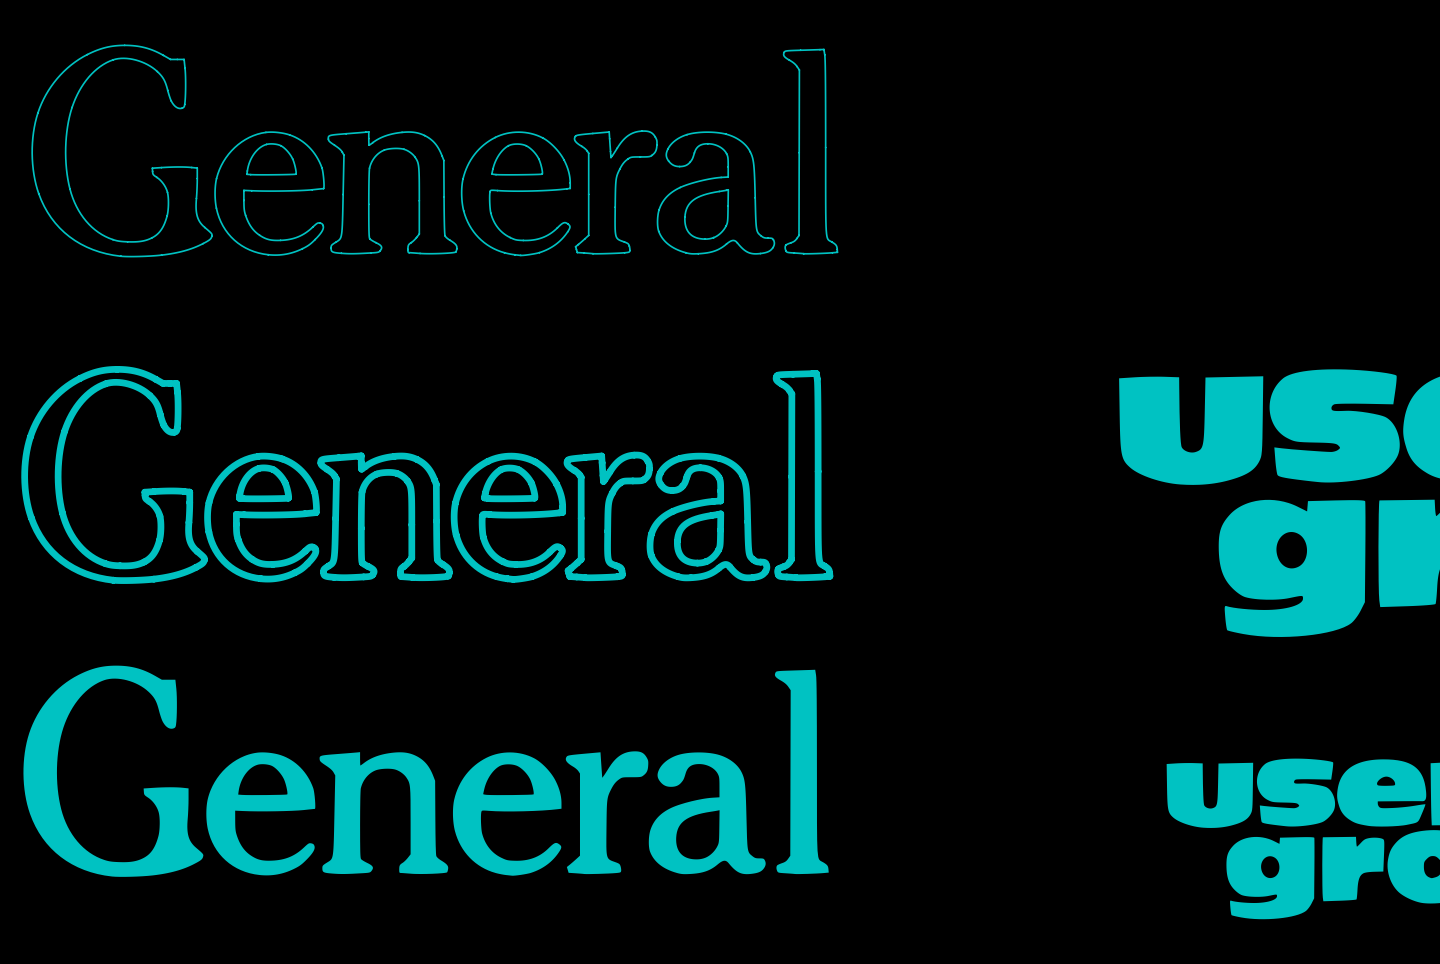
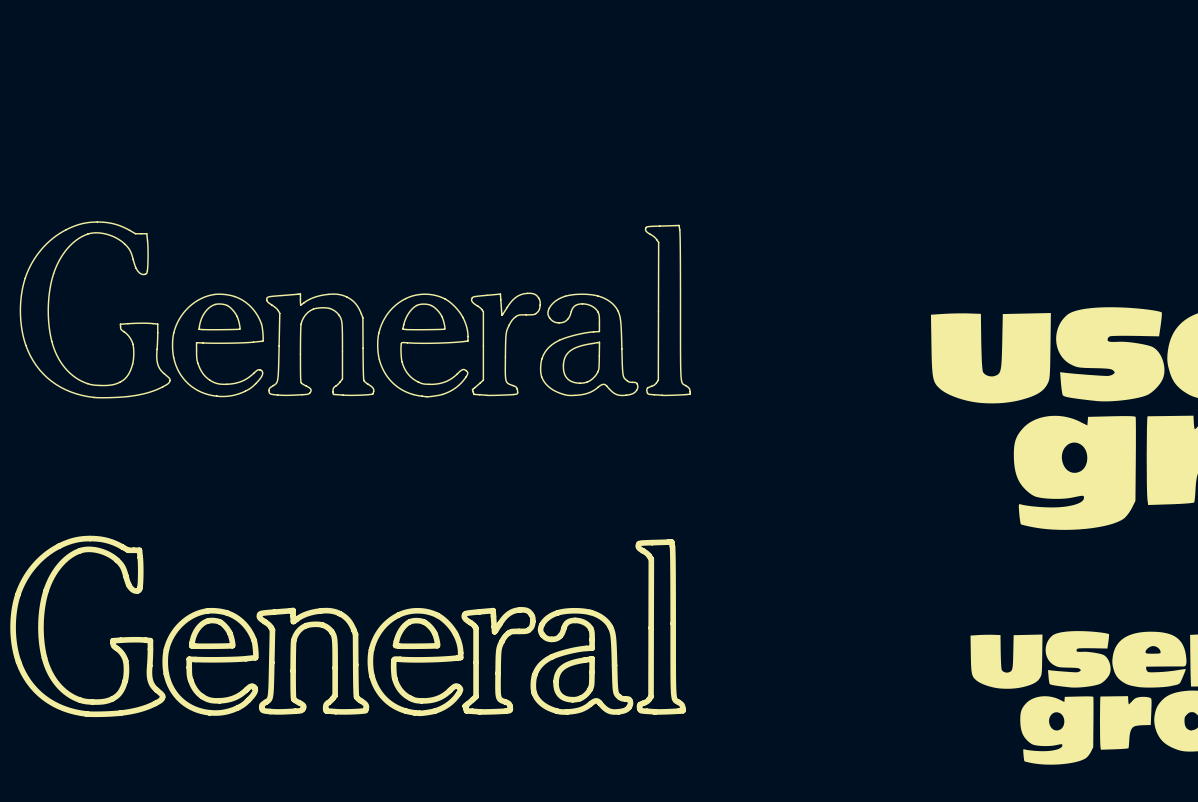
line: (124, 45) (147, 48) (170, 59) (184, 59) (184, 106) (180, 108) (174, 105) (162, 77) (144, 63) (129, 58) (118, 58) (97, 68) (79, 90) (68, 121) (65, 158) (71, 193) (80, 214) (98, 232) (117, 240) (142, 241) (159, 232) (167, 212) (166, 190) (162, 182) (153, 174) (152, 168) (197, 168) (196, 214) (200, 222) (212, 235) (207, 241) (187, 250) (161, 255) (131, 256) (113, 255) (92, 249) (74, 240) (59, 228) (47, 212) (37, 188) (32, 163) (32, 137) (37, 112) (48, 90) (63, 71) (83, 56) (103, 48) (124, 45) -> none
line: (823, 49) (826, 230) (828, 239) (836, 245) (837, 252) (788, 252) (785, 249) (785, 245) (794, 241) (799, 235) (799, 69) (783, 53) (787, 50) (823, 49) -> none
line: (368, 131) (369, 145) (385, 135) (408, 132) (424, 135) (436, 145) (443, 160) (444, 235) (456, 245) (455, 252) (429, 253) (408, 252) (408, 244) (419, 234) (418, 167) (417, 160) (411, 153) (404, 149) (396, 148) (386, 149) (379, 152) (373, 159) (369, 168) (369, 237) (380, 245) (380, 250) (376, 252) (353, 253) (331, 250) (331, 245) (339, 239) (341, 233) (343, 155) (340, 149) (329, 141) (328, 136) (368, 131) -> none
line: (641, 131) (650, 132) (654, 136) (656, 141) (655, 151) (650, 156) (631, 157) (626, 159) (619, 170) (615, 182) (615, 233) (617, 238) (628, 244) (629, 251) (602, 253) (577, 252) (575, 246) (588, 235) (588, 153) (575, 141) (575, 136) (609, 132) (610, 157) (625, 137) (632, 133) (641, 131) -> none
line: (265, 132) (245, 139) (225, 157) (216, 180) (215, 204) (223, 226) (237, 243) (258, 253) (283, 254) (296, 251) (309, 244) (321, 232) (322, 224) (317, 223) (303, 234) (292, 238) (277, 240) (265, 238) (255, 231) (247, 220) (244, 209) (243, 190) (288, 190) (323, 188) (322, 172) (316, 156) (302, 141) (286, 134) (265, 132) -> none
line: (726, 134) (740, 141) (750, 153) (754, 167) (756, 229) (763, 237) (772, 238) (773, 245) (768, 251) (756, 253) (746, 251) (733, 240) (717, 249) (707, 252) (691, 253) (678, 250) (665, 241) (658, 231) (657, 216) (661, 204) (669, 194) (682, 186) (705, 179) (728, 177) (727, 158) (725, 151) (720, 147) (704, 144) (696, 147) (688, 163) (677, 166) (668, 160) (667, 150) (674, 141) (687, 134) (706, 132) (726, 134) -> none
line: (495, 137) (515, 132) (537, 135) (553, 145) (565, 162) (569, 175) (570, 188) (532, 191) (491, 190) (489, 192) (490, 209) (493, 221) (501, 232) (512, 238) (523, 240) (537, 239) (550, 233) (563, 223) (569, 225) (569, 228) (562, 238) (546, 250) (522, 255) (500, 251) (481, 240) (467, 221) (461, 196) (464, 172) (476, 151) (495, 137) -> none
line: (266, 144) (259, 147) (252, 155) (246, 174) (295, 174) (293, 159) (285, 149) (277, 144) (266, 144) -> none
line: (508, 145) (520, 144) (530, 148) (538, 159) (542, 174) (492, 173) (498, 156) (508, 145) -> none
line: (728, 189) (727, 221) (723, 230) (716, 236) (708, 238) (697, 238) (690, 234) (686, 228) (684, 219) (686, 209) (689, 203) (703, 194) (728, 189) -> none
line: (117, 369) (139, 372) (163, 383) (176, 383) (176, 430) (172, 432) (166, 429) (155, 401) (137, 387) (122, 382) (110, 382) (89, 392) (71, 414) (60, 445) (58, 482) (63, 517) (73, 538) (90, 556) (110, 564) (135, 565) (151, 556) (160, 536) (159, 514) (154, 506) (145, 498) (144, 492) (189, 492) (189, 538) (192, 546) (204, 559) (199, 565) (179, 574) (153, 579) (123, 580) (105, 579) (85, 573) (67, 564) (52, 551) (40, 536) (29, 512) (25, 487) (25, 461) (30, 436) (40, 414) (56, 395) (75, 380) (96, 372) (117, 369) -> (97, 222) (116, 224) (135, 233) (146, 233) (146, 272) (143, 274) (138, 272) (128, 248) (113, 236) (101, 233) (92, 233) (74, 241) (59, 259) (50, 285) (48, 315) (52, 345) (60, 362) (75, 377) (91, 384) (112, 384) (126, 377) (133, 360) (132, 342) (121, 329) (120, 324) (157, 324) (157, 362) (160, 369) (170, 380) (166, 385) (149, 392) (128, 396) (102, 397) (87, 396) (70, 391) (55, 384) (43, 373) (33, 360) (24, 341) (20, 320) (21, 298) (25, 278) (33, 259) (46, 243) (62, 231) (79, 224) (97, 222)
line: (816, 373) (779, 374) (776, 377) (791, 393) (791, 559) (786, 565) (778, 569) (778, 573) (780, 576) (829, 576) (828, 569) (820, 563) (818, 554) (816, 373) -> (679, 225) (648, 226) (645, 228) (658, 242) (658, 380) (654, 384) (647, 388) (649, 394) (690, 394) (689, 388) (682, 383) (681, 375) (679, 225)
line: (361, 455) (320, 460) (321, 465) (332, 473) (336, 479) (334, 557) (332, 563) (323, 569) (324, 574) (345, 577) (369, 576) (373, 574) (373, 569) (361, 561) (362, 492) (365, 483) (371, 476) (378, 473) (389, 472) (397, 473) (404, 477) (409, 484) (411, 491) (411, 558) (401, 568) (400, 576) (422, 577) (448, 576) (448, 569) (437, 559) (436, 484) (429, 469) (417, 459) (401, 456) (378, 459) (361, 469) (361, 455) -> (300, 293) (266, 298) (267, 301) (279, 313) (277, 378) (276, 383) (269, 388) (269, 392) (287, 395) (307, 394) (310, 392) (310, 388) (300, 381) (301, 324) (309, 311) (323, 307) (336, 312) (342, 323) (342, 378) (333, 387) (333, 394) (372, 393) (373, 388) (363, 380) (362, 317) (357, 305) (346, 297) (333, 294) (314, 297) (300, 305) (300, 293)
line: (634, 455) (642, 456) (647, 460) (649, 465) (648, 475) (642, 480) (624, 481) (619, 483) (611, 494) (608, 506) (608, 557) (610, 562) (620, 568) (622, 575) (594, 577) (569, 576) (568, 570) (581, 559) (581, 477) (568, 465) (567, 460) (601, 455) (603, 481) (617, 461) (625, 457) (634, 455) -> (527, 293) (534, 294) (538, 297) (540, 302) (539, 310) (534, 314) (519, 315) (515, 317) (508, 326) (505, 335) (505, 378) (507, 383) (516, 387) (517, 393) (473, 394) (472, 389) (483, 380) (483, 311) (472, 302) (472, 298) (500, 294) (501, 315) (513, 298) (527, 293)
line: (258, 456) (237, 463) (218, 481) (208, 504) (208, 528) (215, 550) (230, 567) (251, 577) (276, 578) (288, 575) (302, 568) (314, 556) (315, 548) (310, 547) (296, 558) (284, 562) (269, 564) (257, 562) (247, 555) (239, 544) (236, 533) (236, 514) (280, 514) (316, 512) (315, 496) (309, 480) (295, 465) (279, 458) (258, 456) -> (214, 294) (197, 300) (181, 315) (173, 334) (173, 354) (179, 372) (191, 386) (208, 394) (229, 396) (251, 387) (261, 377) (262, 371) (257, 369) (246, 378) (236, 382) (224, 384) (214, 382) (205, 376) (199, 367) (196, 358) (196, 342) (262, 341) (262, 328) (257, 314) (245, 302) (232, 295) (214, 294)
line: (718, 458) (698, 456) (679, 458) (666, 465) (659, 474) (660, 484) (670, 490) (681, 487) (689, 471) (696, 468) (712, 471) (717, 475) (720, 482) (720, 501) (698, 503) (674, 510) (661, 518) (653, 528) (650, 540) (651, 555) (657, 565) (670, 574) (683, 577) (699, 576) (710, 573) (725, 564) (739, 575) (749, 577) (760, 575) (766, 569) (765, 562) (755, 561) (749, 553) (746, 491) (743, 477) (733, 465) (718, 458) -> (597, 295) (581, 294) (565, 296) (554, 301) (548, 309) (549, 317) (557, 322) (566, 320) (573, 307) (579, 304) (592, 306) (599, 315) (599, 331) (580, 333) (561, 339) (550, 345) (543, 354) (540, 364) (541, 376) (547, 385) (558, 392) (568, 395) (581, 394) (603, 384) (614, 393) (623, 395) (632, 393) (637, 388) (636, 383) (628, 381) (623, 375) (620, 323) (618, 311) (609, 301) (597, 295)
line: (487, 461) (508, 456) (529, 459) (545, 469) (557, 486) (562, 499) (562, 512) (524, 514) (484, 514) (482, 516) (482, 533) (486, 545) (494, 556) (505, 562) (515, 564) (530, 563) (542, 557) (555, 547) (561, 549) (561, 552) (554, 562) (538, 574) (514, 579) (493, 575) (473, 564) (460, 545) (454, 520) (457, 496) (469, 475) (487, 461) -> (405, 298) (422, 294) (440, 296) (453, 305) (464, 319) (467, 341) (401, 344) (401, 358) (404, 368) (411, 377) (420, 382) (441, 383) (451, 378) (462, 369) (467, 371) (467, 374) (461, 382) (447, 392) (427, 396) (410, 393) (393, 384) (382, 368) (377, 348) (380, 327) (390, 310) (405, 298)
line: (259, 468) (252, 471) (245, 479) (239, 498) (288, 498) (285, 483) (278, 473) (270, 468) (259, 468) -> (215, 304) (204, 313) (199, 329) (239, 329) (237, 317) (231, 308) (224, 304) (215, 304)
line: (501, 469) (490, 480) (484, 497) (534, 498) (531, 483) (523, 472) (513, 468) (501, 469) -> (416, 305) (408, 314) (402, 328) (444, 329) (441, 316) (435, 308) (427, 304) (416, 305)
line: (720, 513) (720, 545) (715, 554) (708, 560) (700, 562) (690, 562) (683, 558) (678, 552) (677, 543) (678, 533) (682, 527) (696, 518) (720, 513) -> (599, 342) (598, 368) (595, 376) (582, 383) (574, 382) (568, 379) (563, 366) (567, 353) (579, 346) (599, 342)
line: none -> (90, 538) (108, 541) (128, 550) (139, 550) (139, 589) (136, 591) (131, 588) (121, 565) (106, 553) (94, 549) (84, 549) (67, 558) (52, 576) (43, 601) (41, 632) (45, 661) (53, 679) (68, 694) (84, 701) (105, 701) (118, 694) (125, 677) (125, 659) (113, 646) (113, 640) (150, 640) (150, 679) (152, 685) (162, 696) (158, 701) (141, 708) (120, 713) (95, 714) (80, 713) (63, 708) (48, 700) (36, 690) (25, 677) (17, 658) (13, 637) (13, 615) (17, 594) (26, 576) (39, 560) (55, 548) (72, 540) (90, 538)
line: none -> (671, 541) (641, 543) (638, 545) (651, 559) (651, 696) (647, 701) (639, 704) (641, 710) (682, 710) (681, 704) (675, 700) (673, 692) (671, 541)
drawing: [23, 665, 829, 877] -> none
line: none -> (293, 610) (259, 614) (260, 618) (272, 629) (270, 695) (269, 699) (262, 705) (262, 709) (280, 711) (299, 710) (303, 708) (302, 705) (293, 698) (293, 640) (301, 628) (316, 624) (328, 628) (334, 640) (335, 695) (326, 704) (325, 710) (365, 710) (365, 704) (356, 696) (355, 634) (349, 622) (339, 613) (326, 610) (307, 613) (293, 621) (293, 610)
line: none -> (520, 609) (527, 610) (531, 614) (532, 618) (531, 626) (527, 630) (511, 631) (507, 633) (501, 642) (498, 652) (498, 695) (500, 699) (509, 703) (510, 710) (466, 710) (465, 706) (476, 696) (476, 628) (465, 618) (464, 614) (493, 610) (494, 631) (506, 615) (520, 609)
line: none -> (207, 610) (190, 616) (174, 632) (166, 650) (165, 671) (171, 688) (184, 703) (201, 711) (222, 712) (244, 704) (253, 693) (254, 687) (250, 686) (239, 695) (229, 699) (216, 700) (207, 699) (198, 693) (192, 684) (189, 675) (189, 659) (255, 657) (255, 644) (249, 631) (238, 618) (225, 612) (207, 610)
line: none -> (590, 612) (573, 610) (557, 612) (547, 618) (541, 626) (542, 634) (550, 639) (559, 637) (566, 623) (571, 620) (585, 623) (591, 632) (592, 648) (573, 650) (553, 656) (543, 662) (536, 671) (533, 680) (534, 693) (539, 701) (550, 708) (561, 711) (574, 711) (596, 700) (607, 710) (615, 712) (625, 710) (630, 705) (629, 699) (621, 698) (615, 691) (613, 640) (610, 628) (602, 618) (590, 612)
line: none -> (398, 615) (415, 610) (433, 613) (446, 622) (456, 636) (460, 657) (393, 660) (394, 675) (397, 684) (403, 693) (412, 699) (433, 699) (444, 695) (454, 686) (459, 688) (459, 691) (454, 699) (440, 708) (420, 713) (402, 710) (386, 700) (375, 685) (370, 664) (373, 644) (382, 627) (398, 615)
line: none -> (208, 620) (196, 630) (191, 645) (232, 645) (230, 633) (224, 625) (217, 621) (208, 620)
line: none -> (409, 622) (400, 630) (395, 645) (437, 645) (434, 633) (427, 624) (419, 620) (409, 622)
line: none -> (592, 658) (591, 685) (587, 692) (575, 699) (566, 699) (560, 696) (556, 683) (560, 670) (571, 662) (592, 658)

